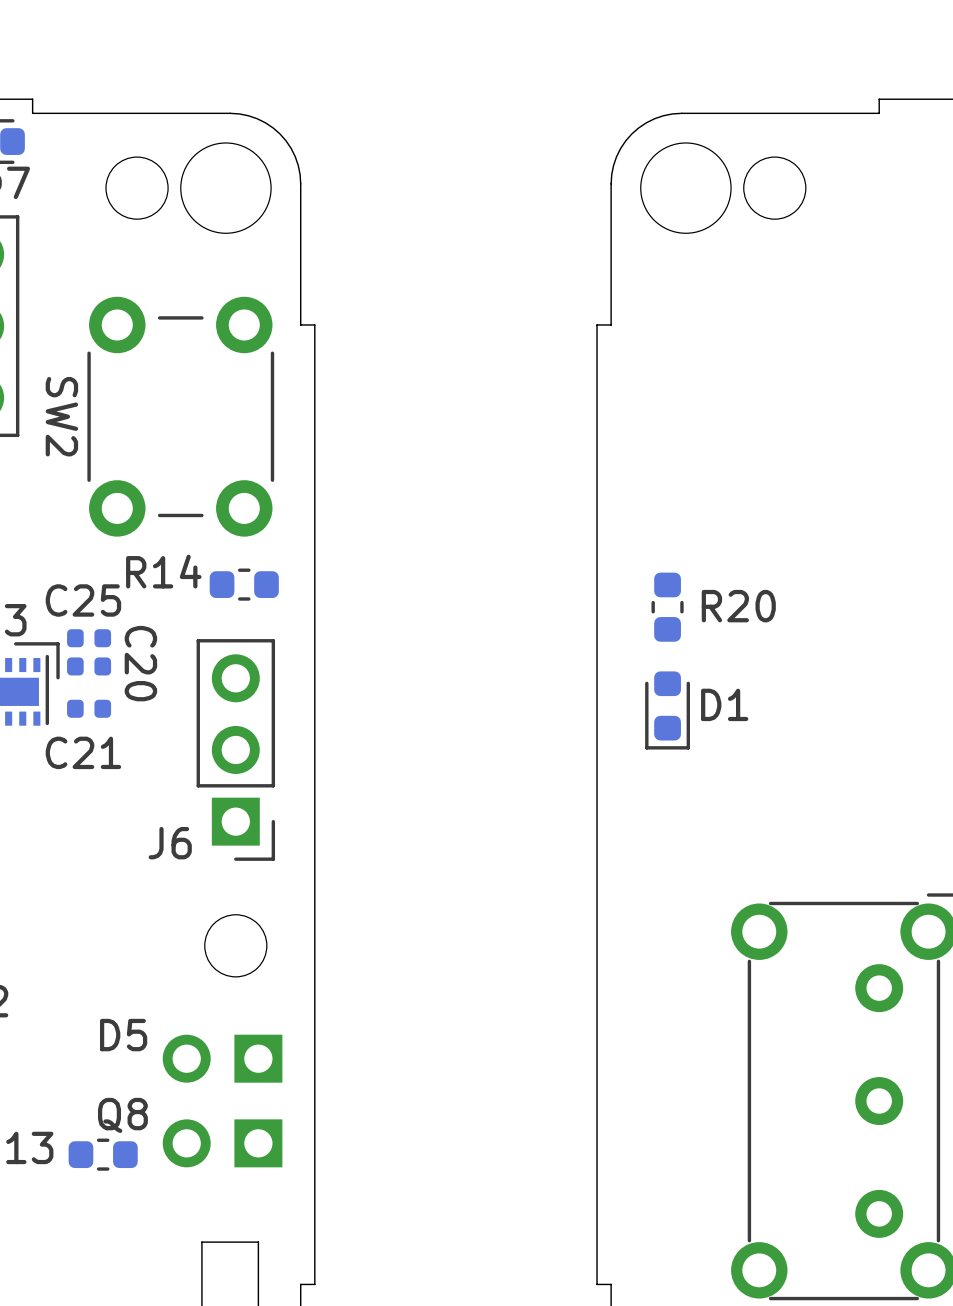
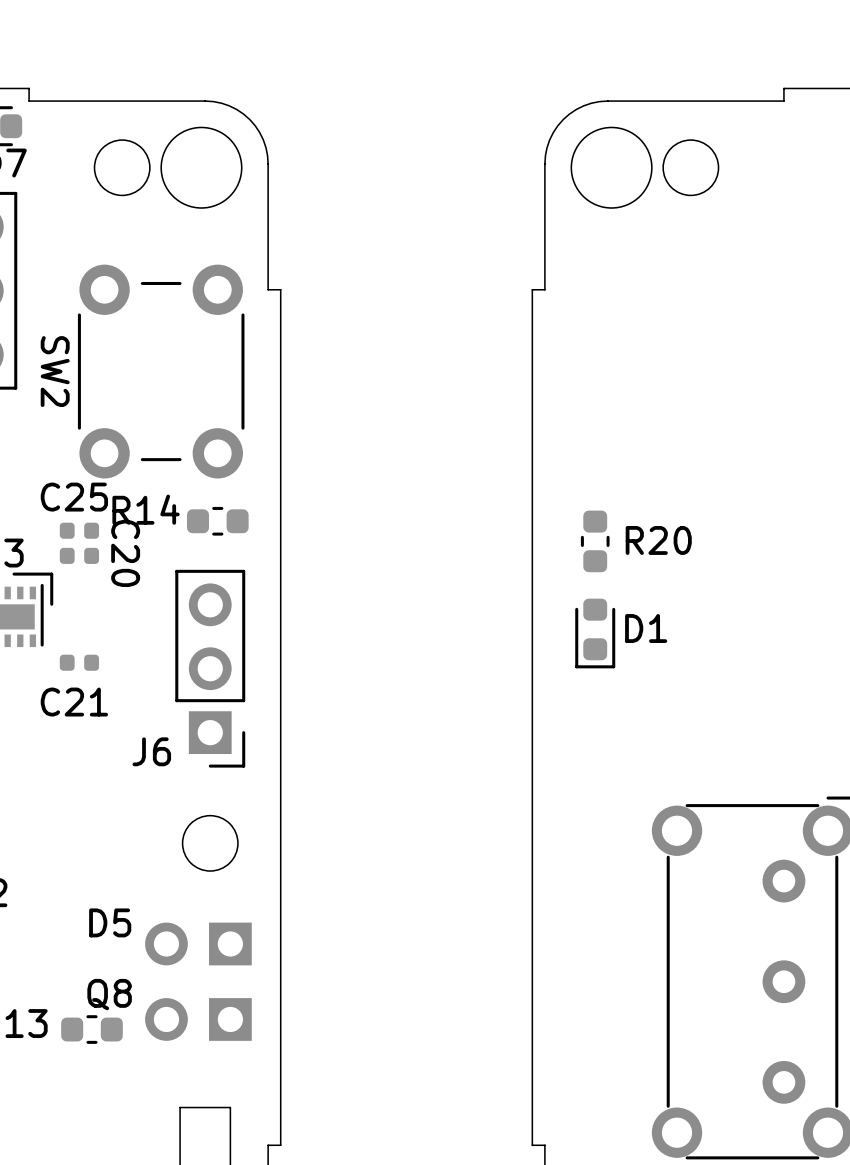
C25 position: (89, 638) -> (79, 530)
C20 position: (89, 666) -> (79, 555)
C21 position: (89, 708) -> (79, 662)

